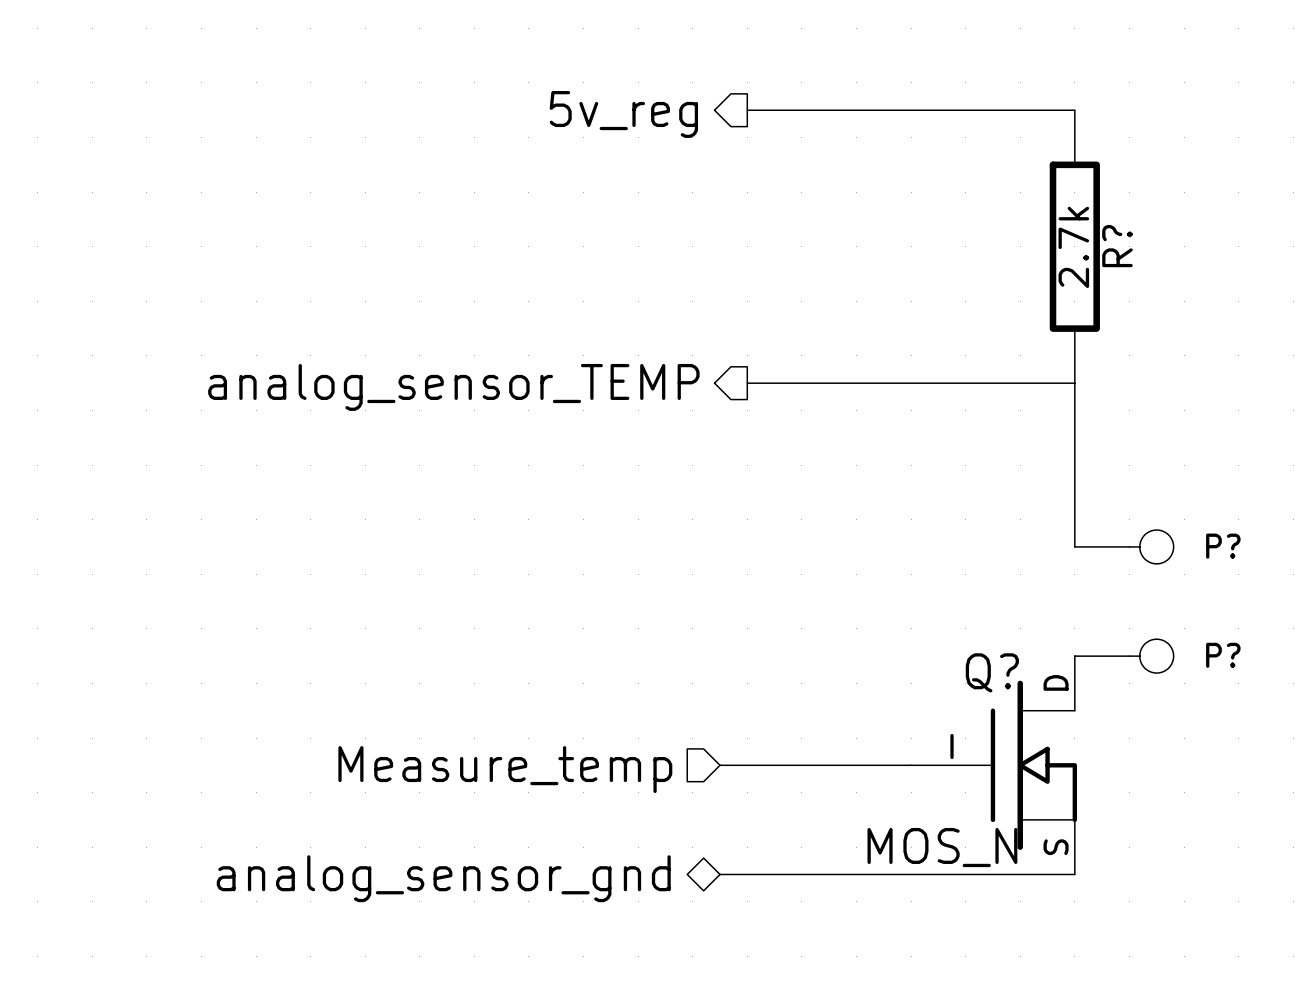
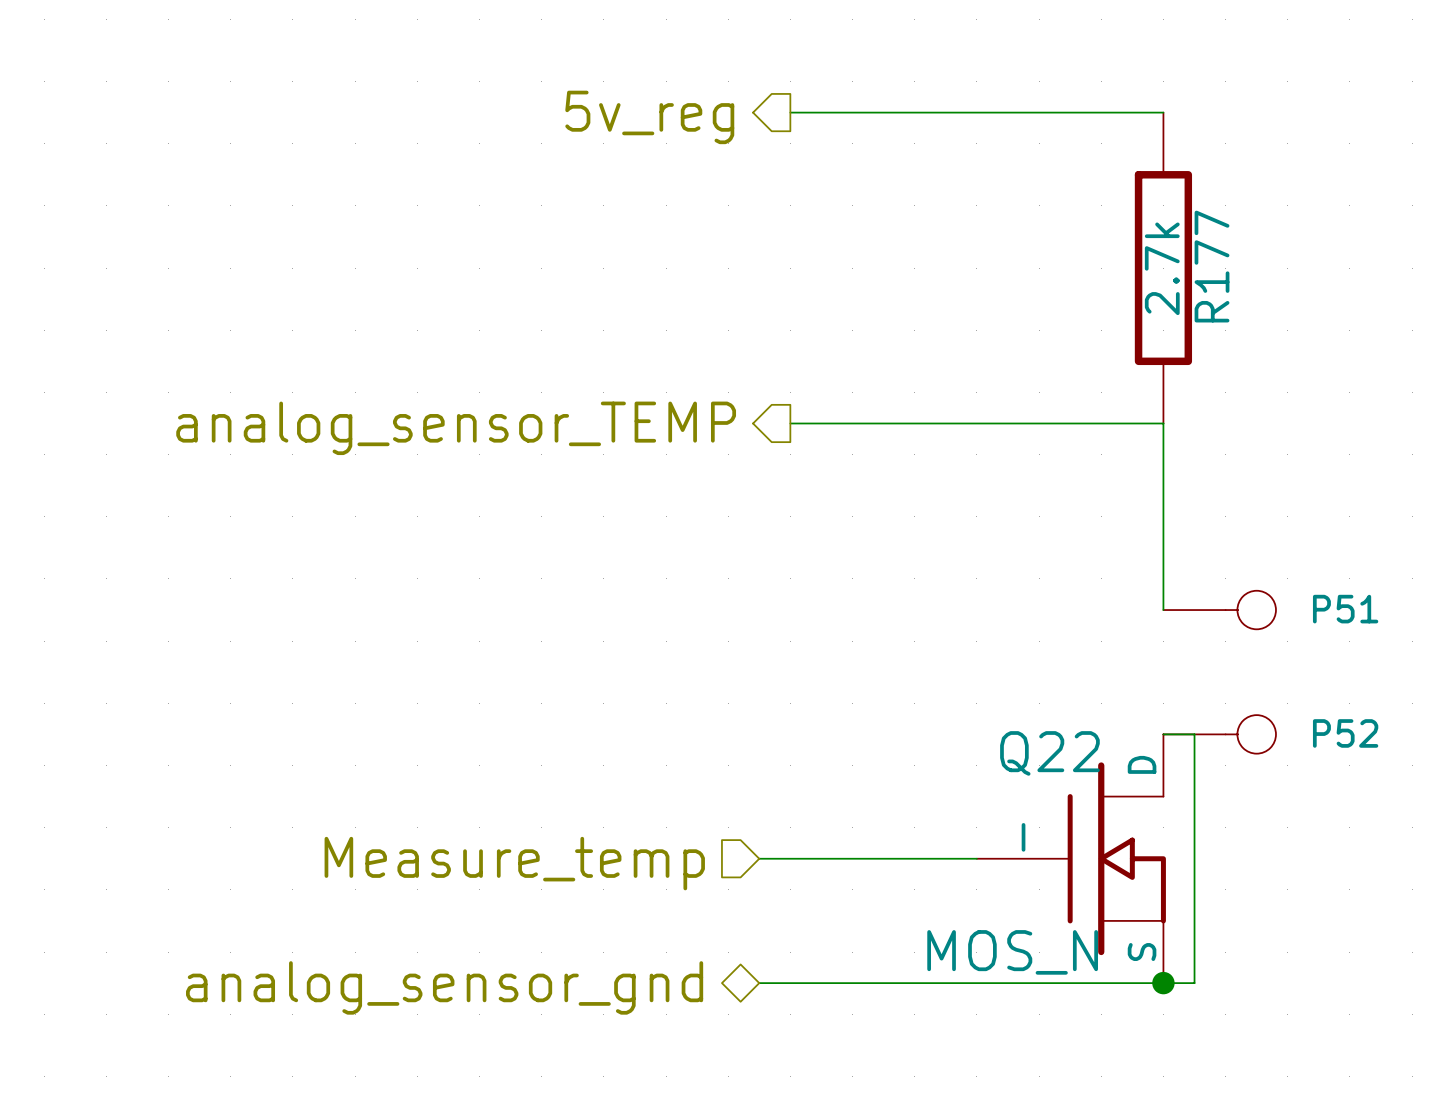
R? name: R? (1117, 246) -> R177 (1212, 266)
P? name: P? (1223, 546) -> P51 (1345, 609)
P? name: P? (1223, 655) -> P52 (1345, 733)
wire: none -> (1163, 734) (1194, 734) (1194, 983) (1163, 983)
Q? name: Q? (992, 672) -> Q22 (1049, 753)
junction: none -> (1163, 983)

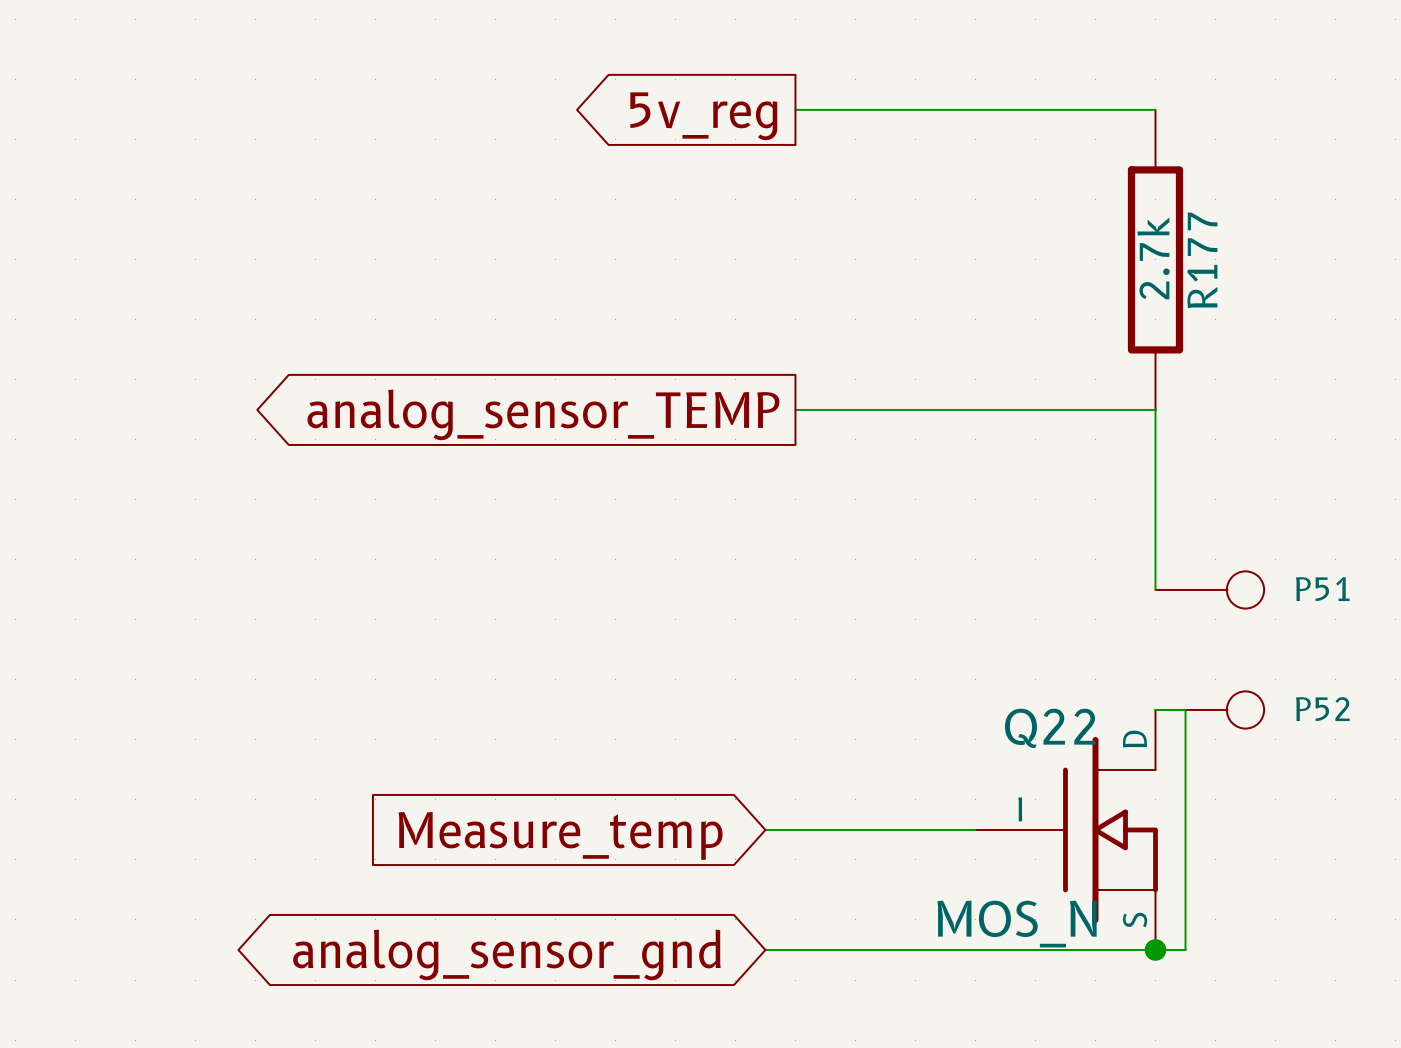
hierarchical label: 5v_reg (649, 117) -> none
global label: none -> 5v_reg (703, 116)
hierarchical label: analog_sensor_TEMP (456, 428) -> none
global label: none -> analog_sensor_TEMP (543, 414)
hierarchical label: Measure_temp (514, 863) -> none
global label: none -> Measure_temp (560, 835)
hierarchical label: analog_sensor_gnd (444, 987) -> none
global label: none -> analog_sensor_gnd (506, 954)

